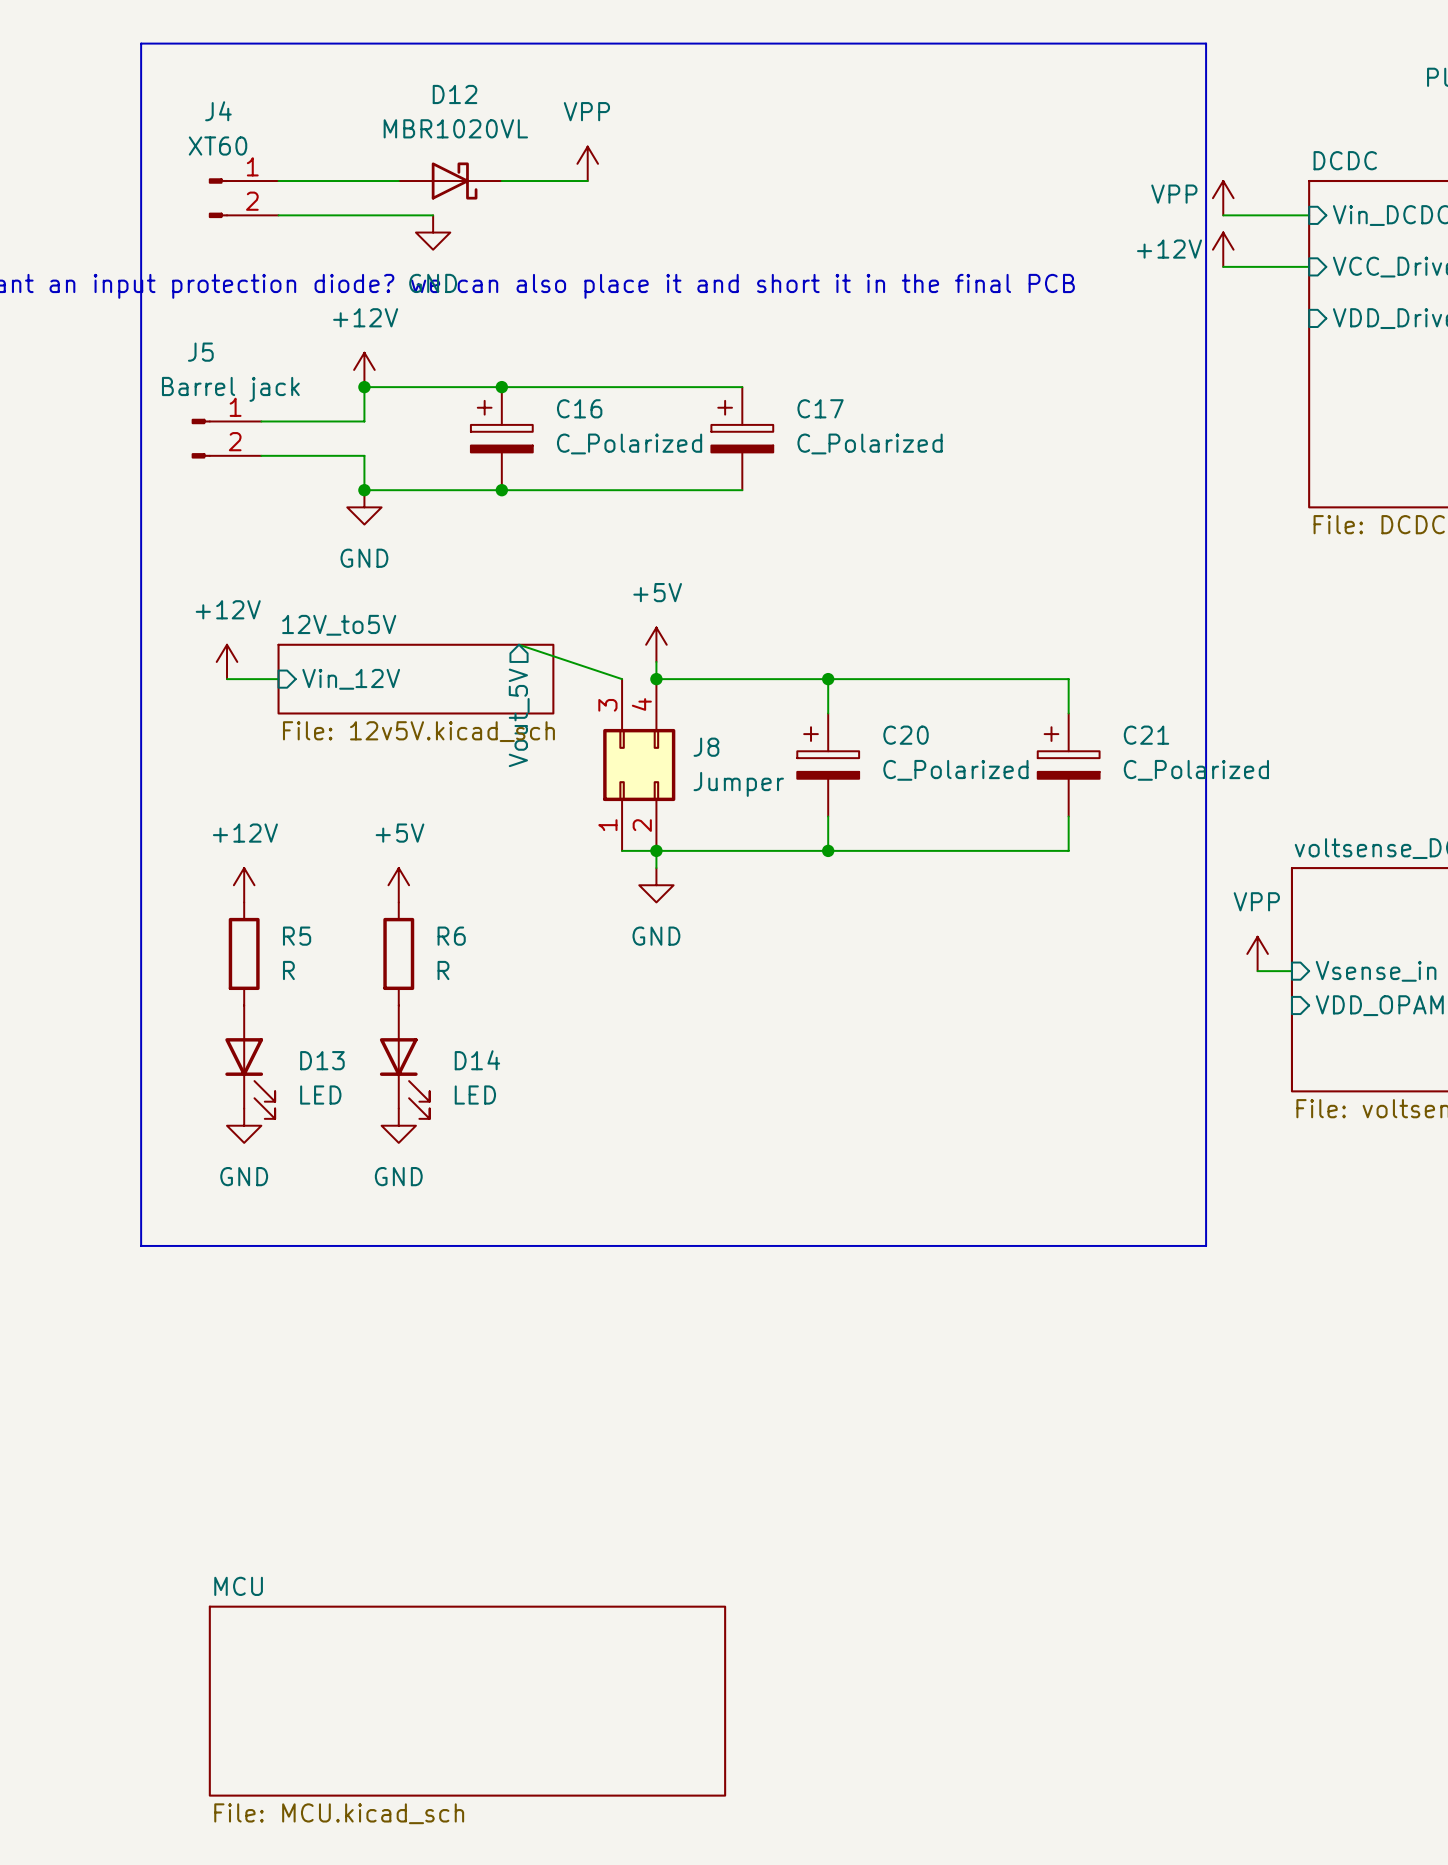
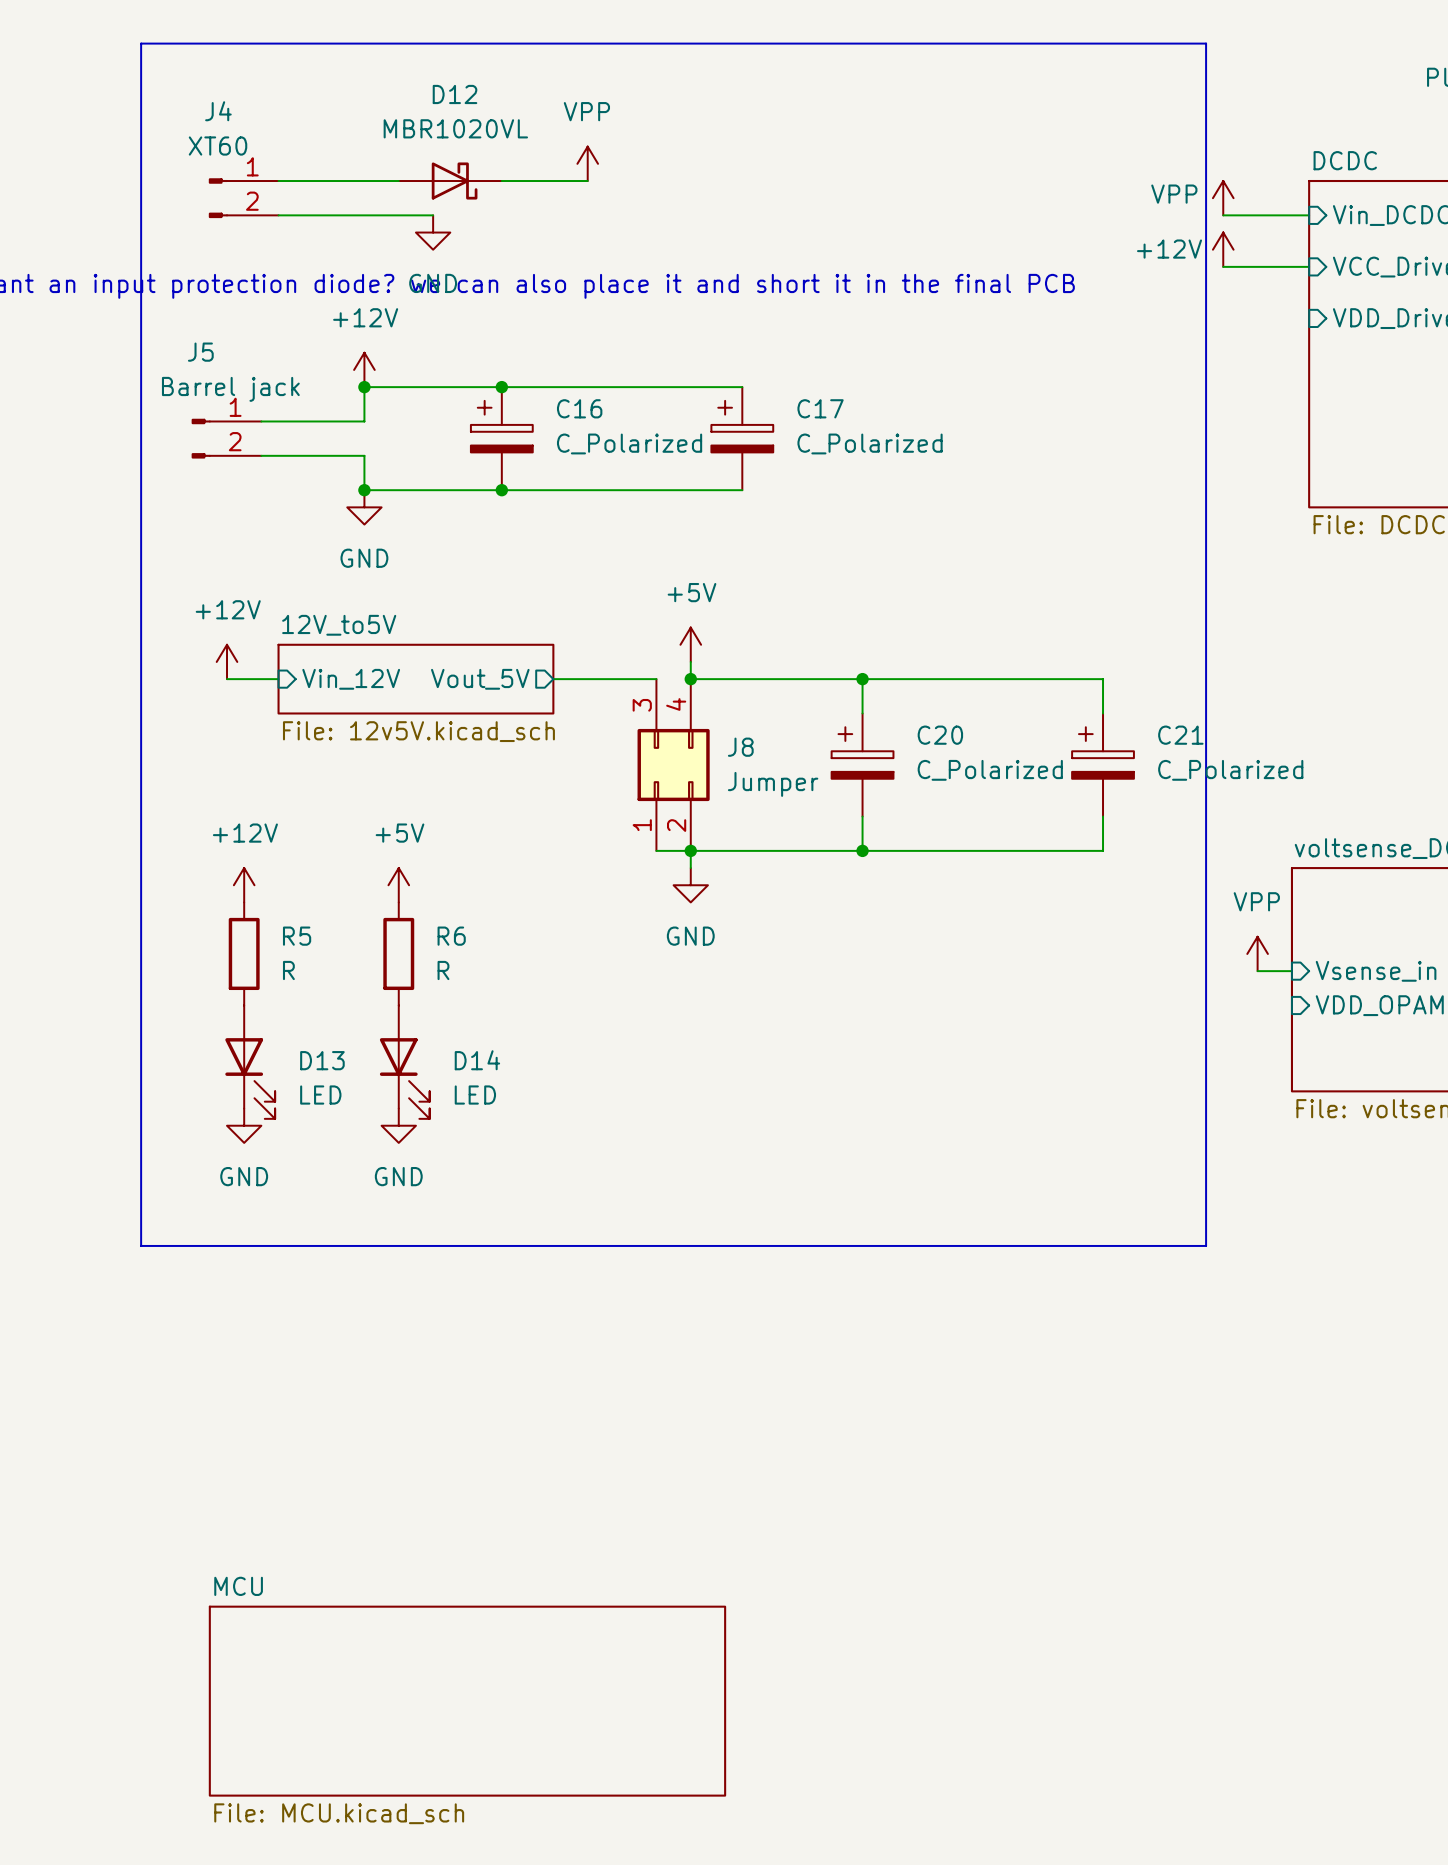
wire: (519, 644) (622, 679) -> none
power symbol position: +5V (656, 644) -> +5V (690, 644)
wire: (656, 661) (656, 679) (690, 679) -> (690, 661) (690, 679)
wire: none -> (553, 679) (656, 679)
junction position: (656, 679) -> (690, 679)
wire: (828, 679) (828, 713) -> (862, 679) (862, 713)
junction position: (828, 679) -> (862, 679)
wire: (1068, 679) (1068, 713) -> (1068, 679) (1103, 679) (1103, 713)
sheet pin rotation: 0° (519, 717) -> 90° clockwise (480, 679)
J8 position: (639, 765) -> (673, 765)
C20 position: (828, 765) -> (862, 765)
C21 position: (1068, 765) -> (1103, 765)
wire: (828, 816) (828, 850) -> (862, 816) (862, 850)
wire: (1068, 816) (1068, 850) -> (1103, 816) (1103, 850) (1068, 850)
wire: (622, 850) (656, 850) (656, 868) -> none
junction position: (656, 850) -> (690, 850)
wire: none -> (690, 850) (690, 868)
junction position: (828, 850) -> (862, 850)
power symbol position: GND (656, 885) -> GND (690, 885)

